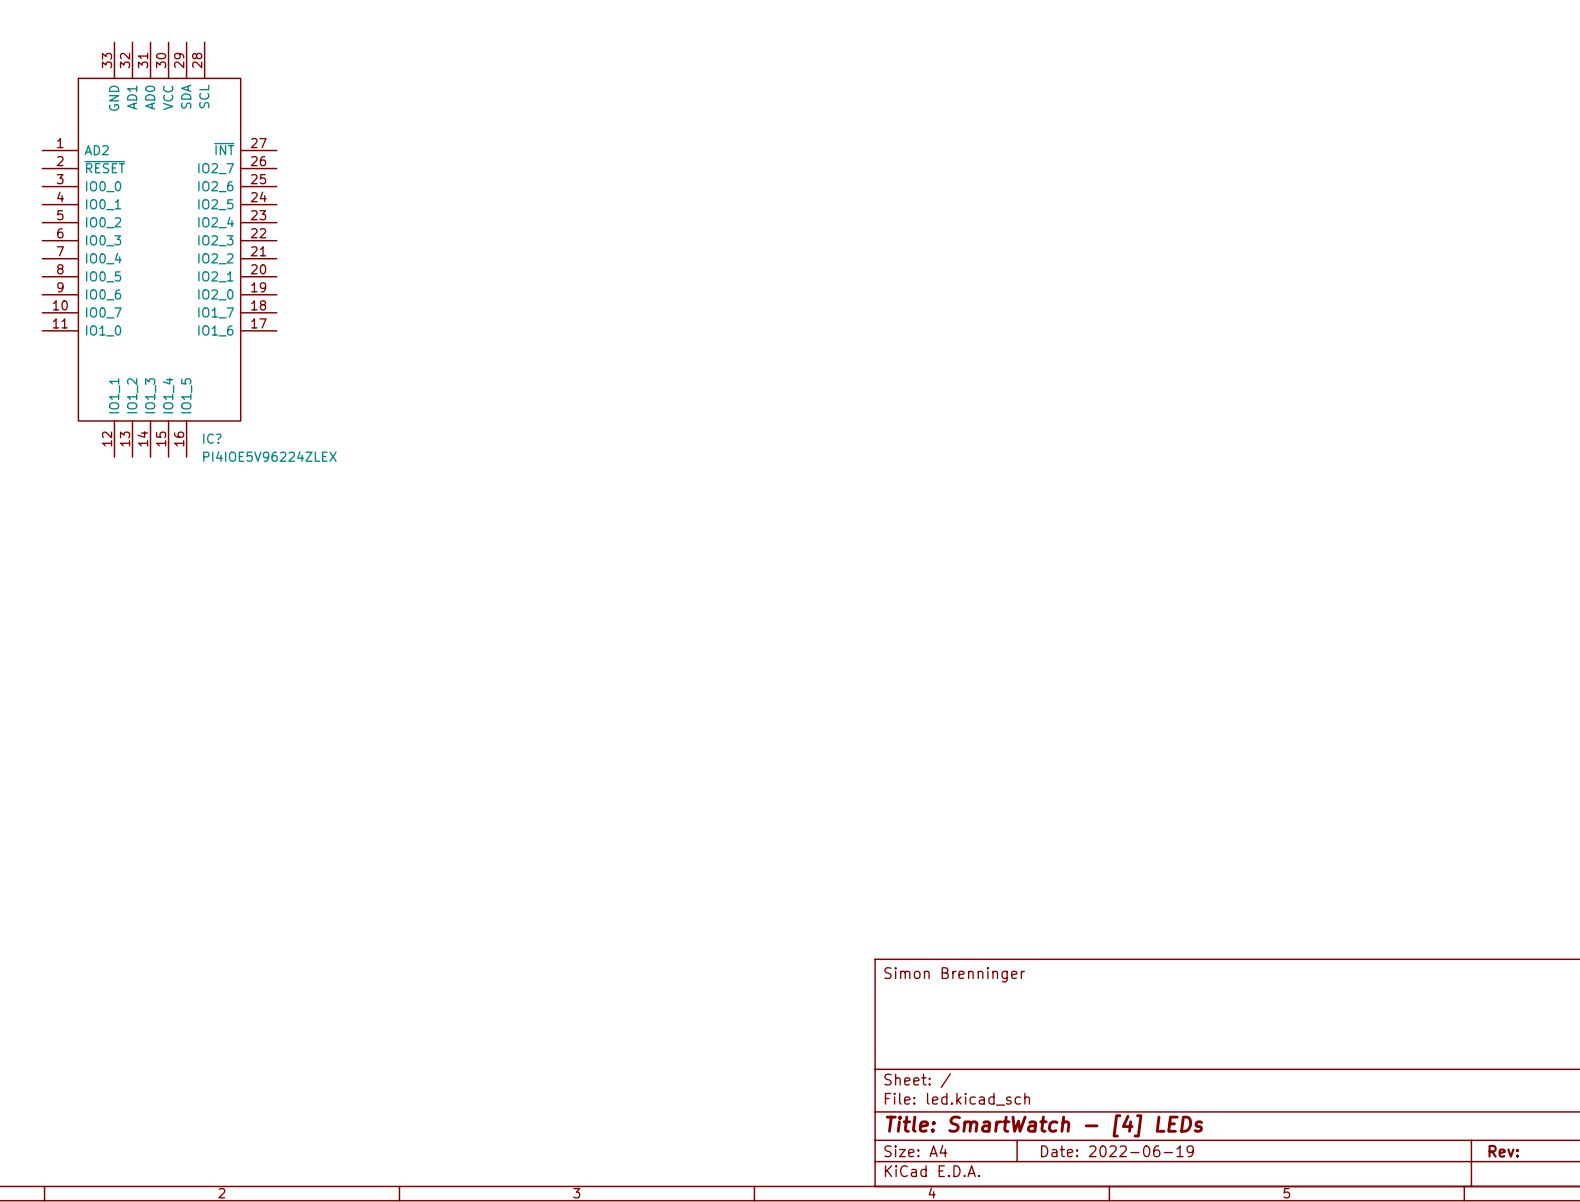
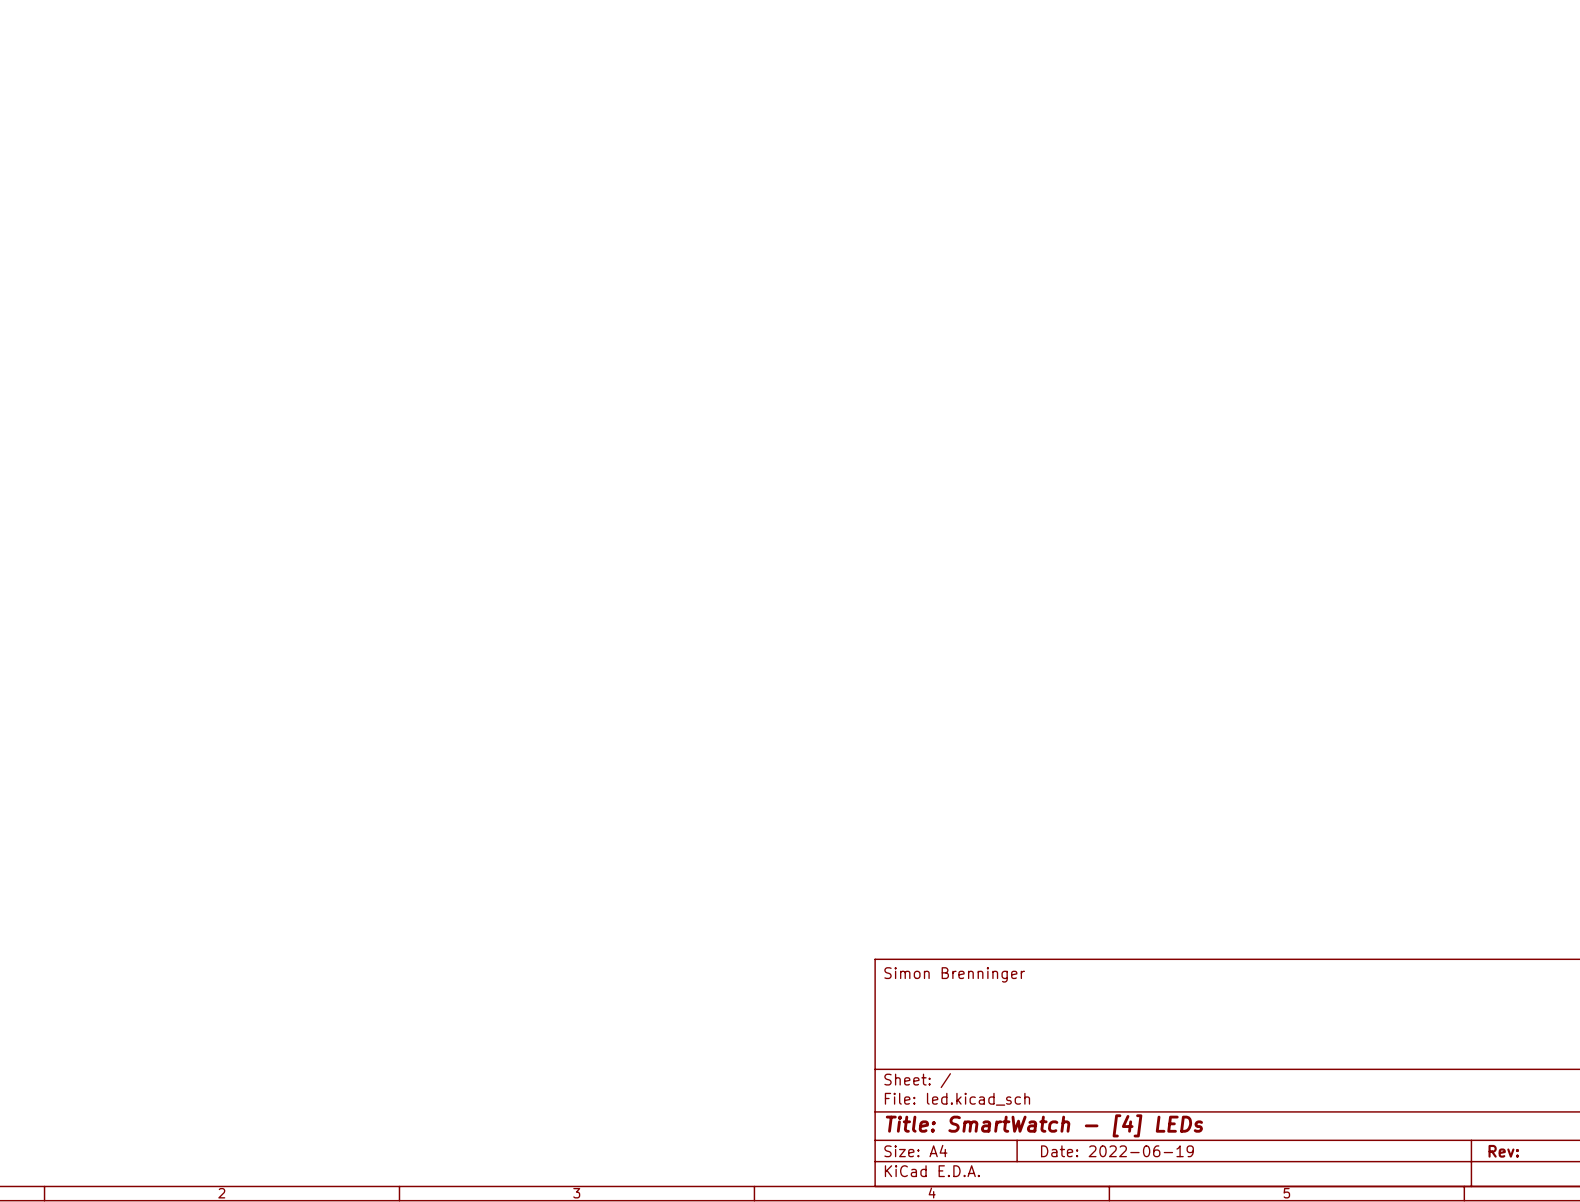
IC?: PI4IOE5V96224ZLEX (159, 249) -> none

